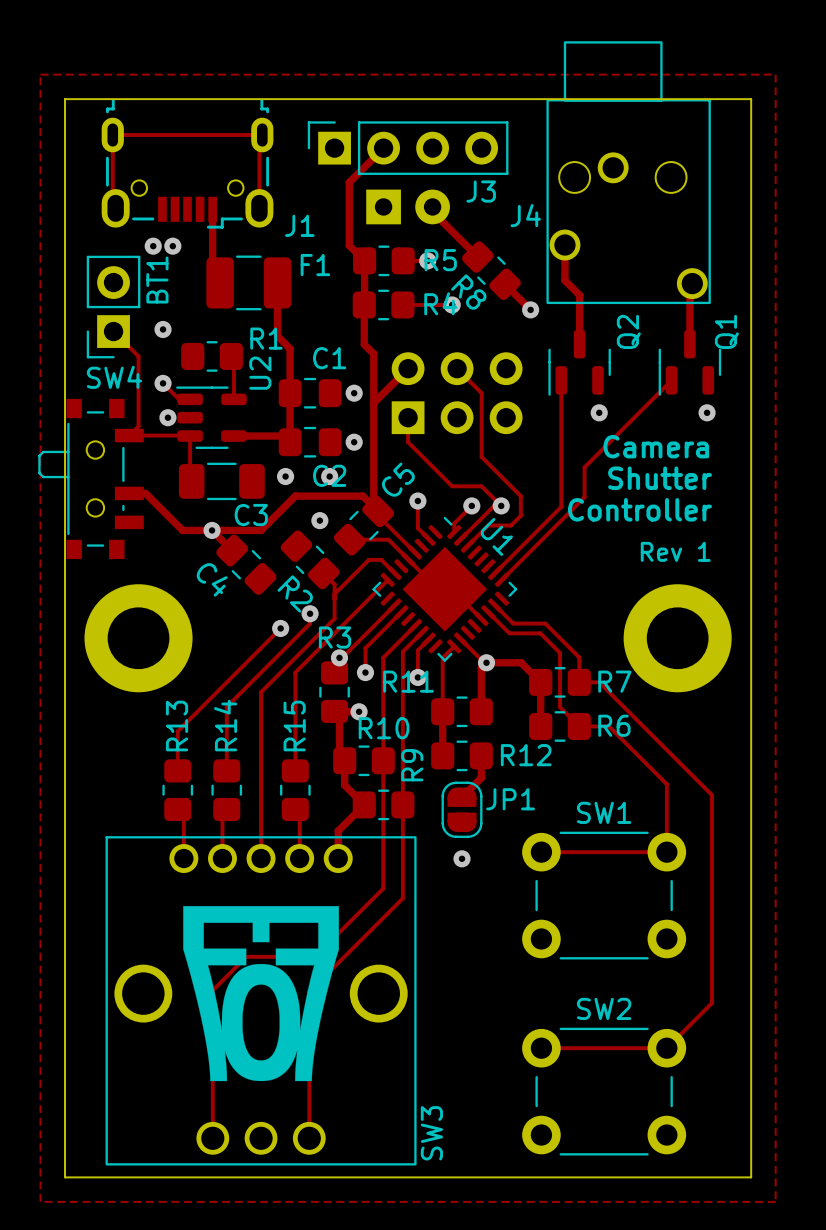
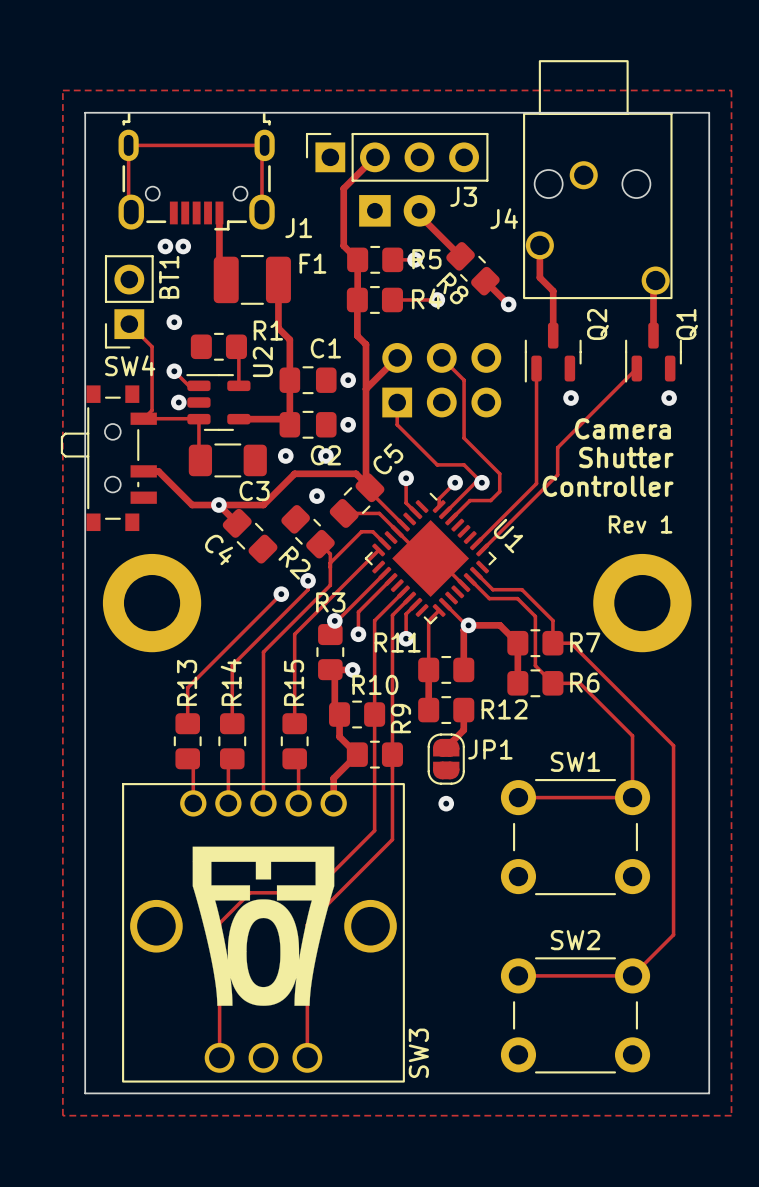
U1 name position: U1 (496, 536) -> U1 (508, 536)

